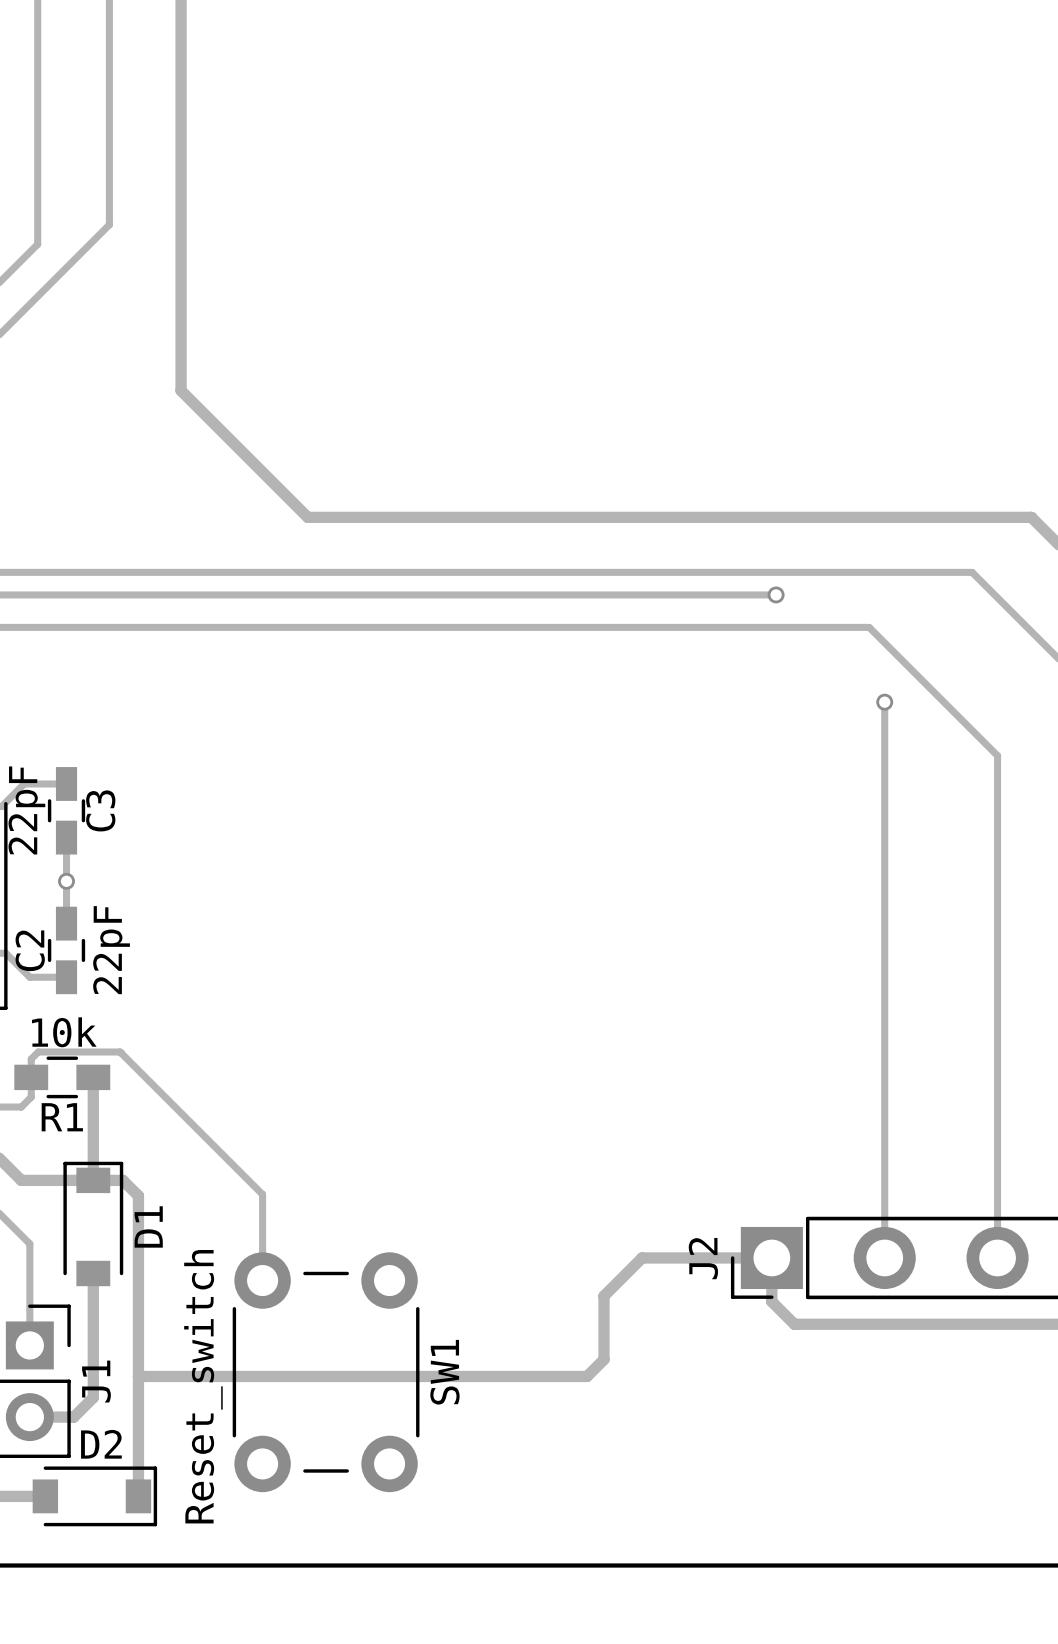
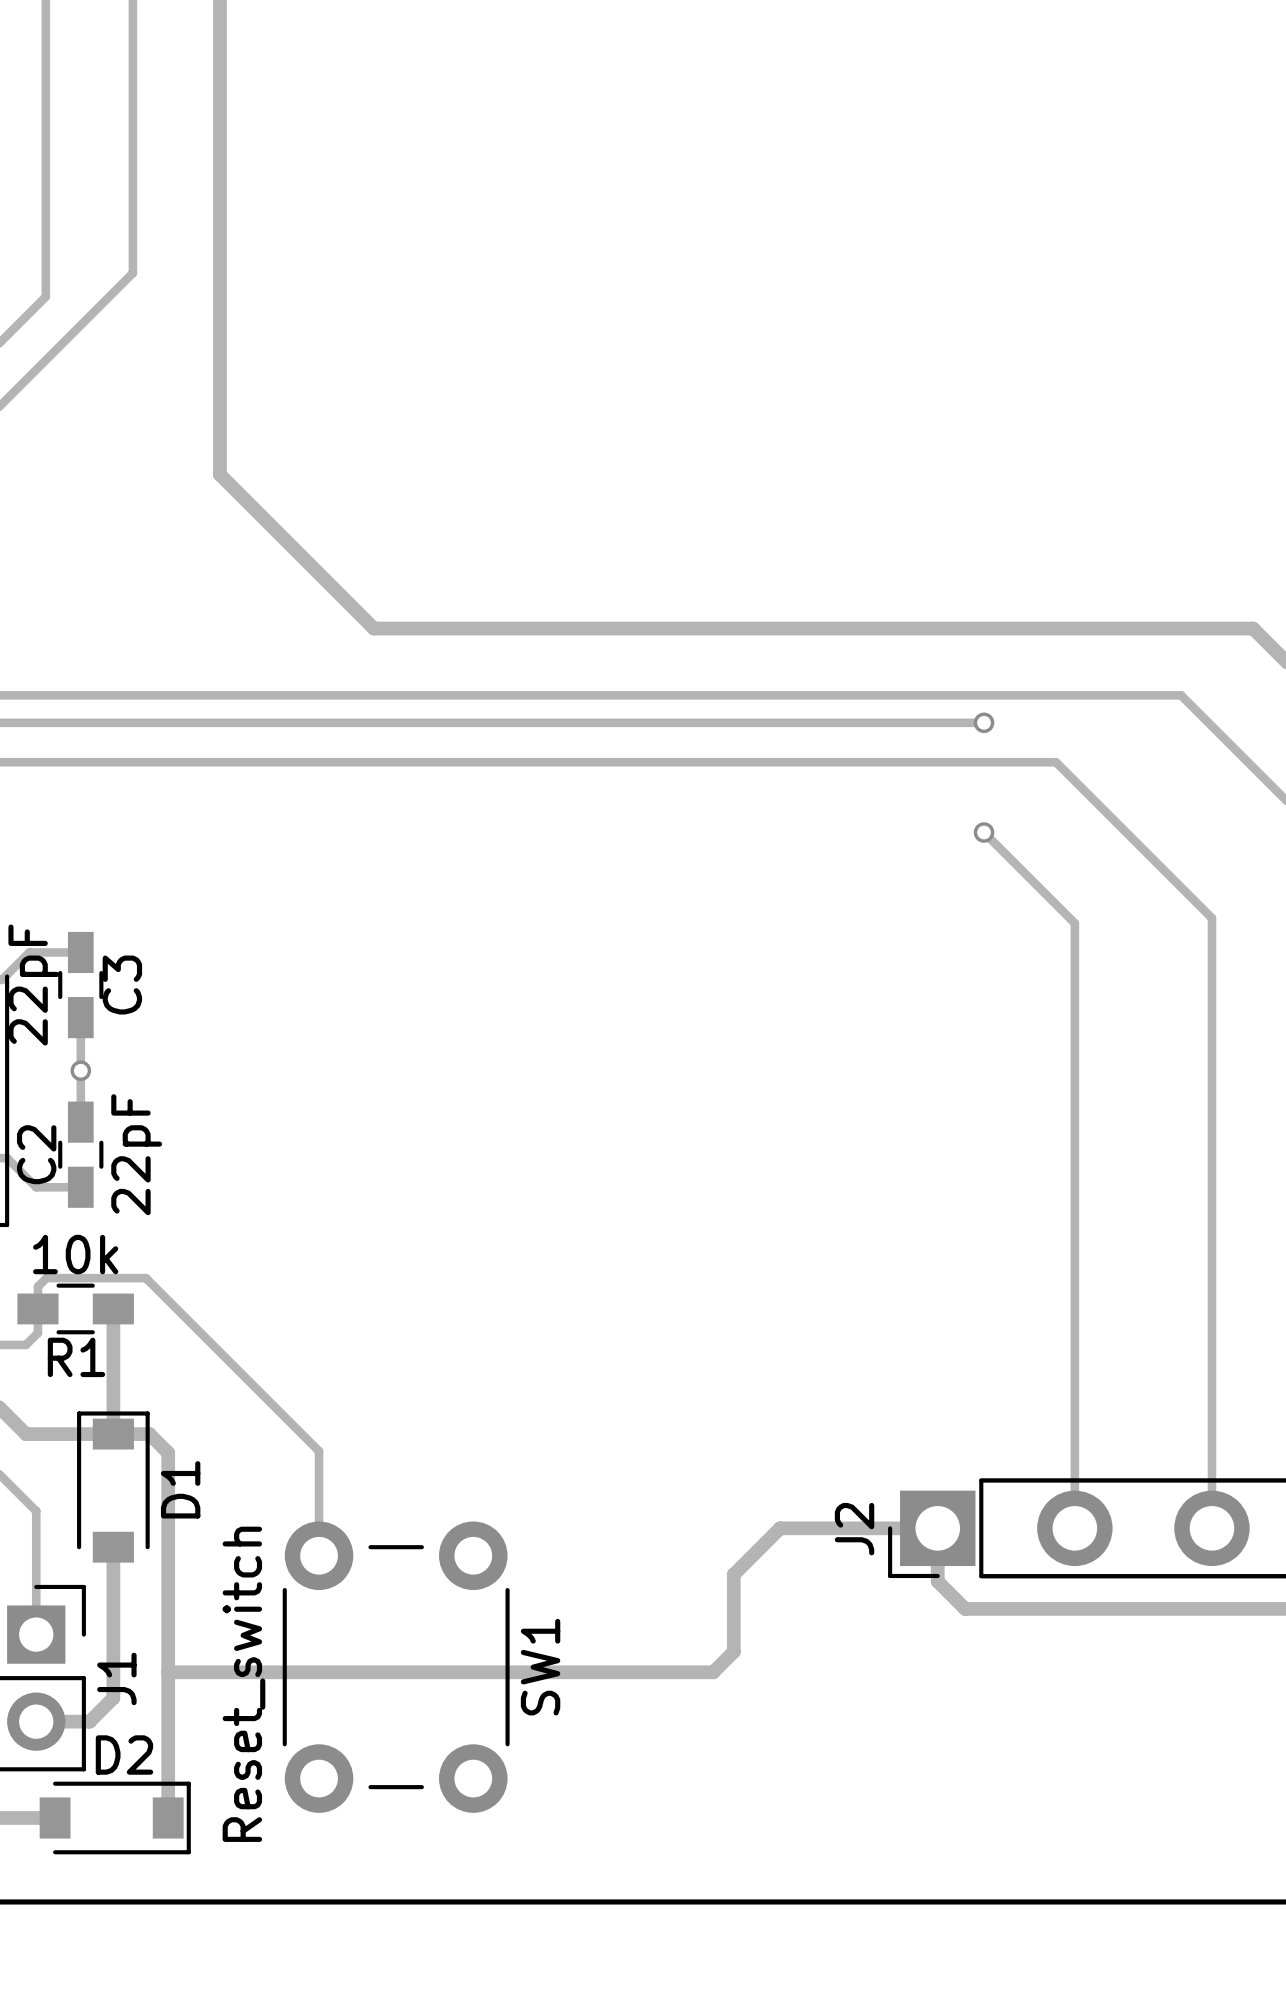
track: none -> (942, 722) (984, 722)
via position: (776, 594) -> (984, 722)
via: none -> (984, 832)
track: (884, 702) (884, 759) -> (984, 832) (1074, 923)
via: (884, 702) -> none

